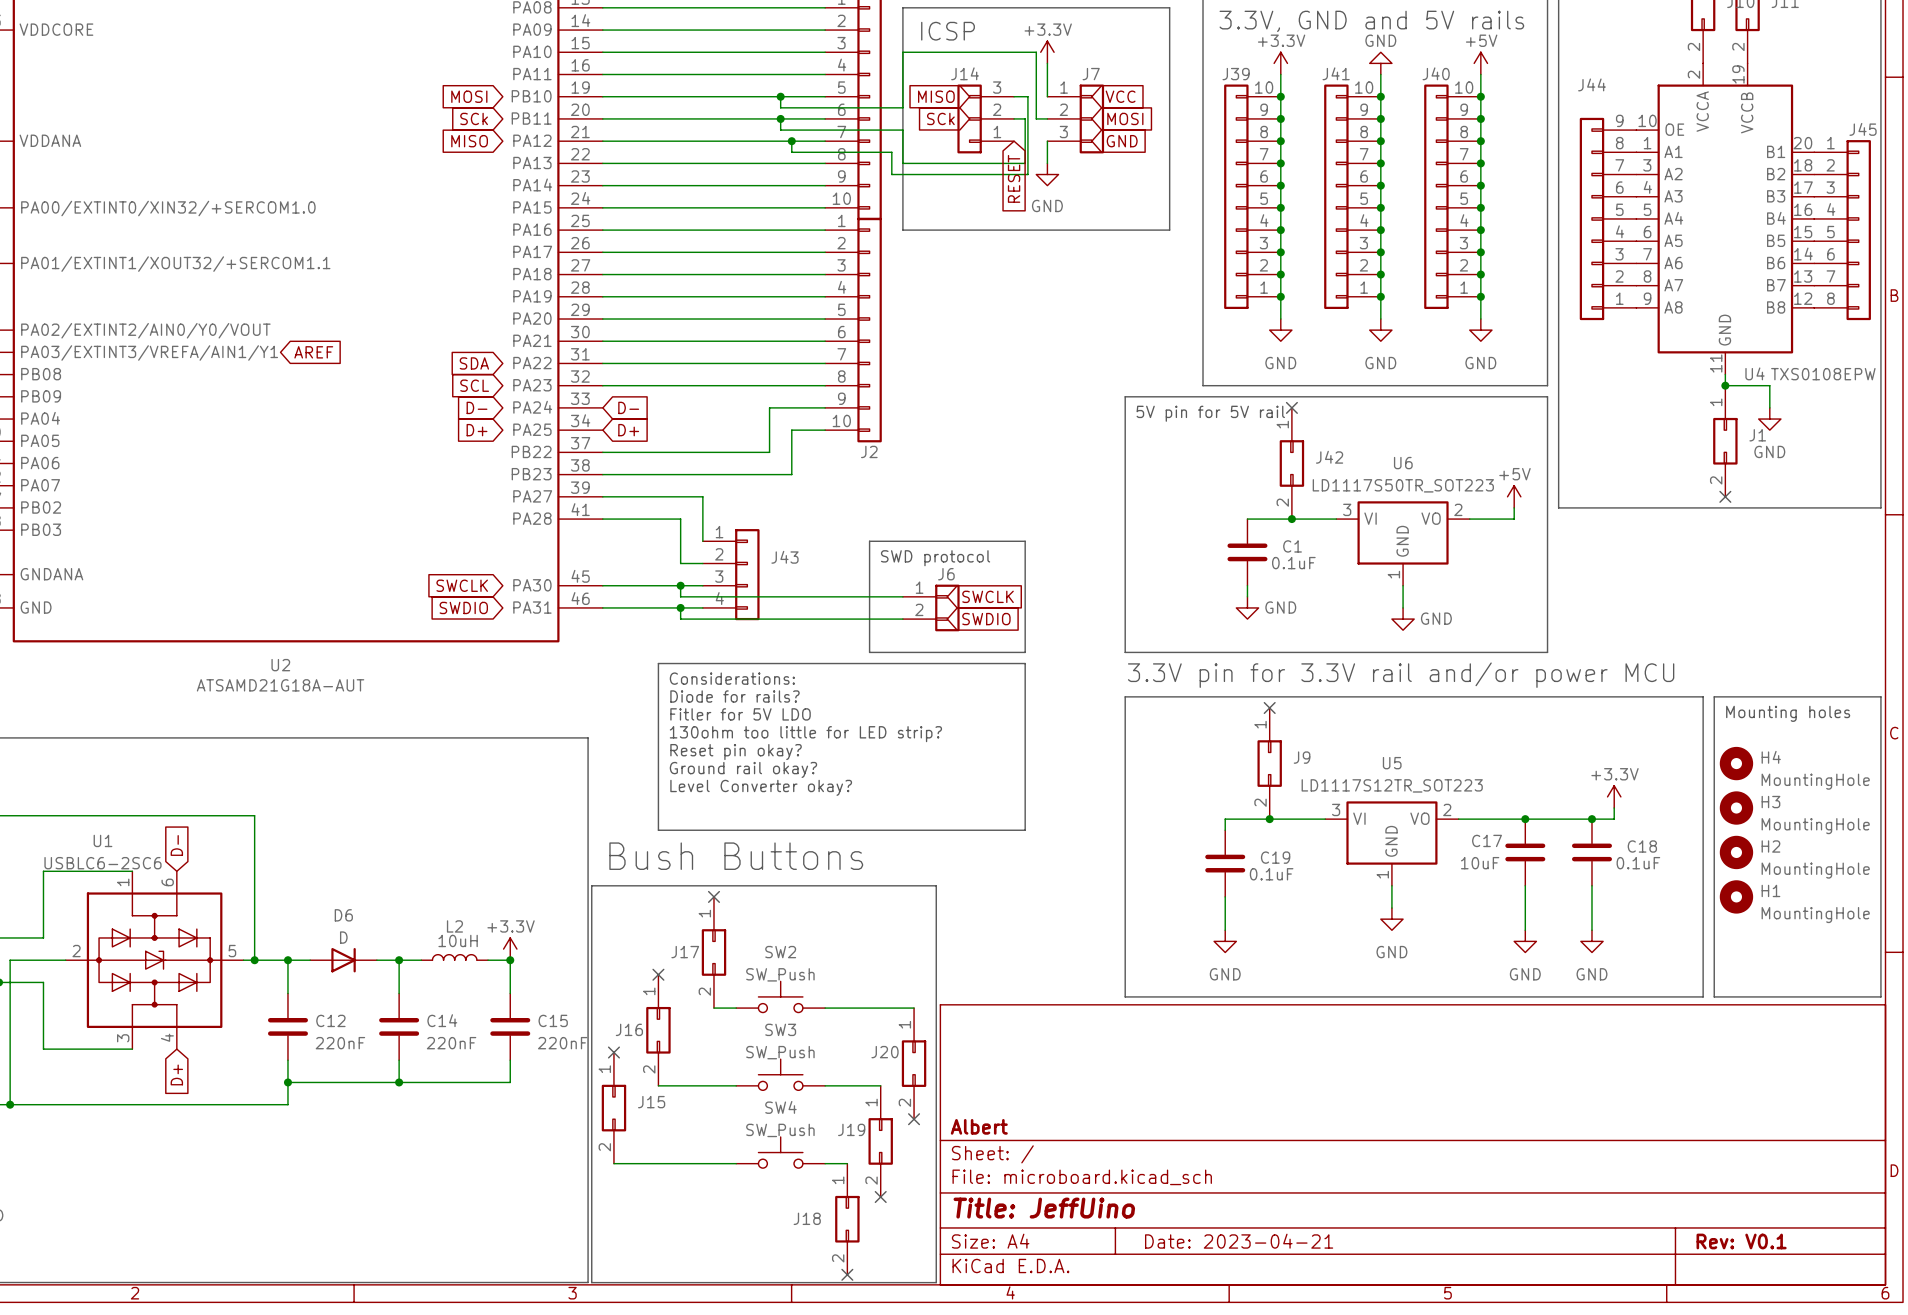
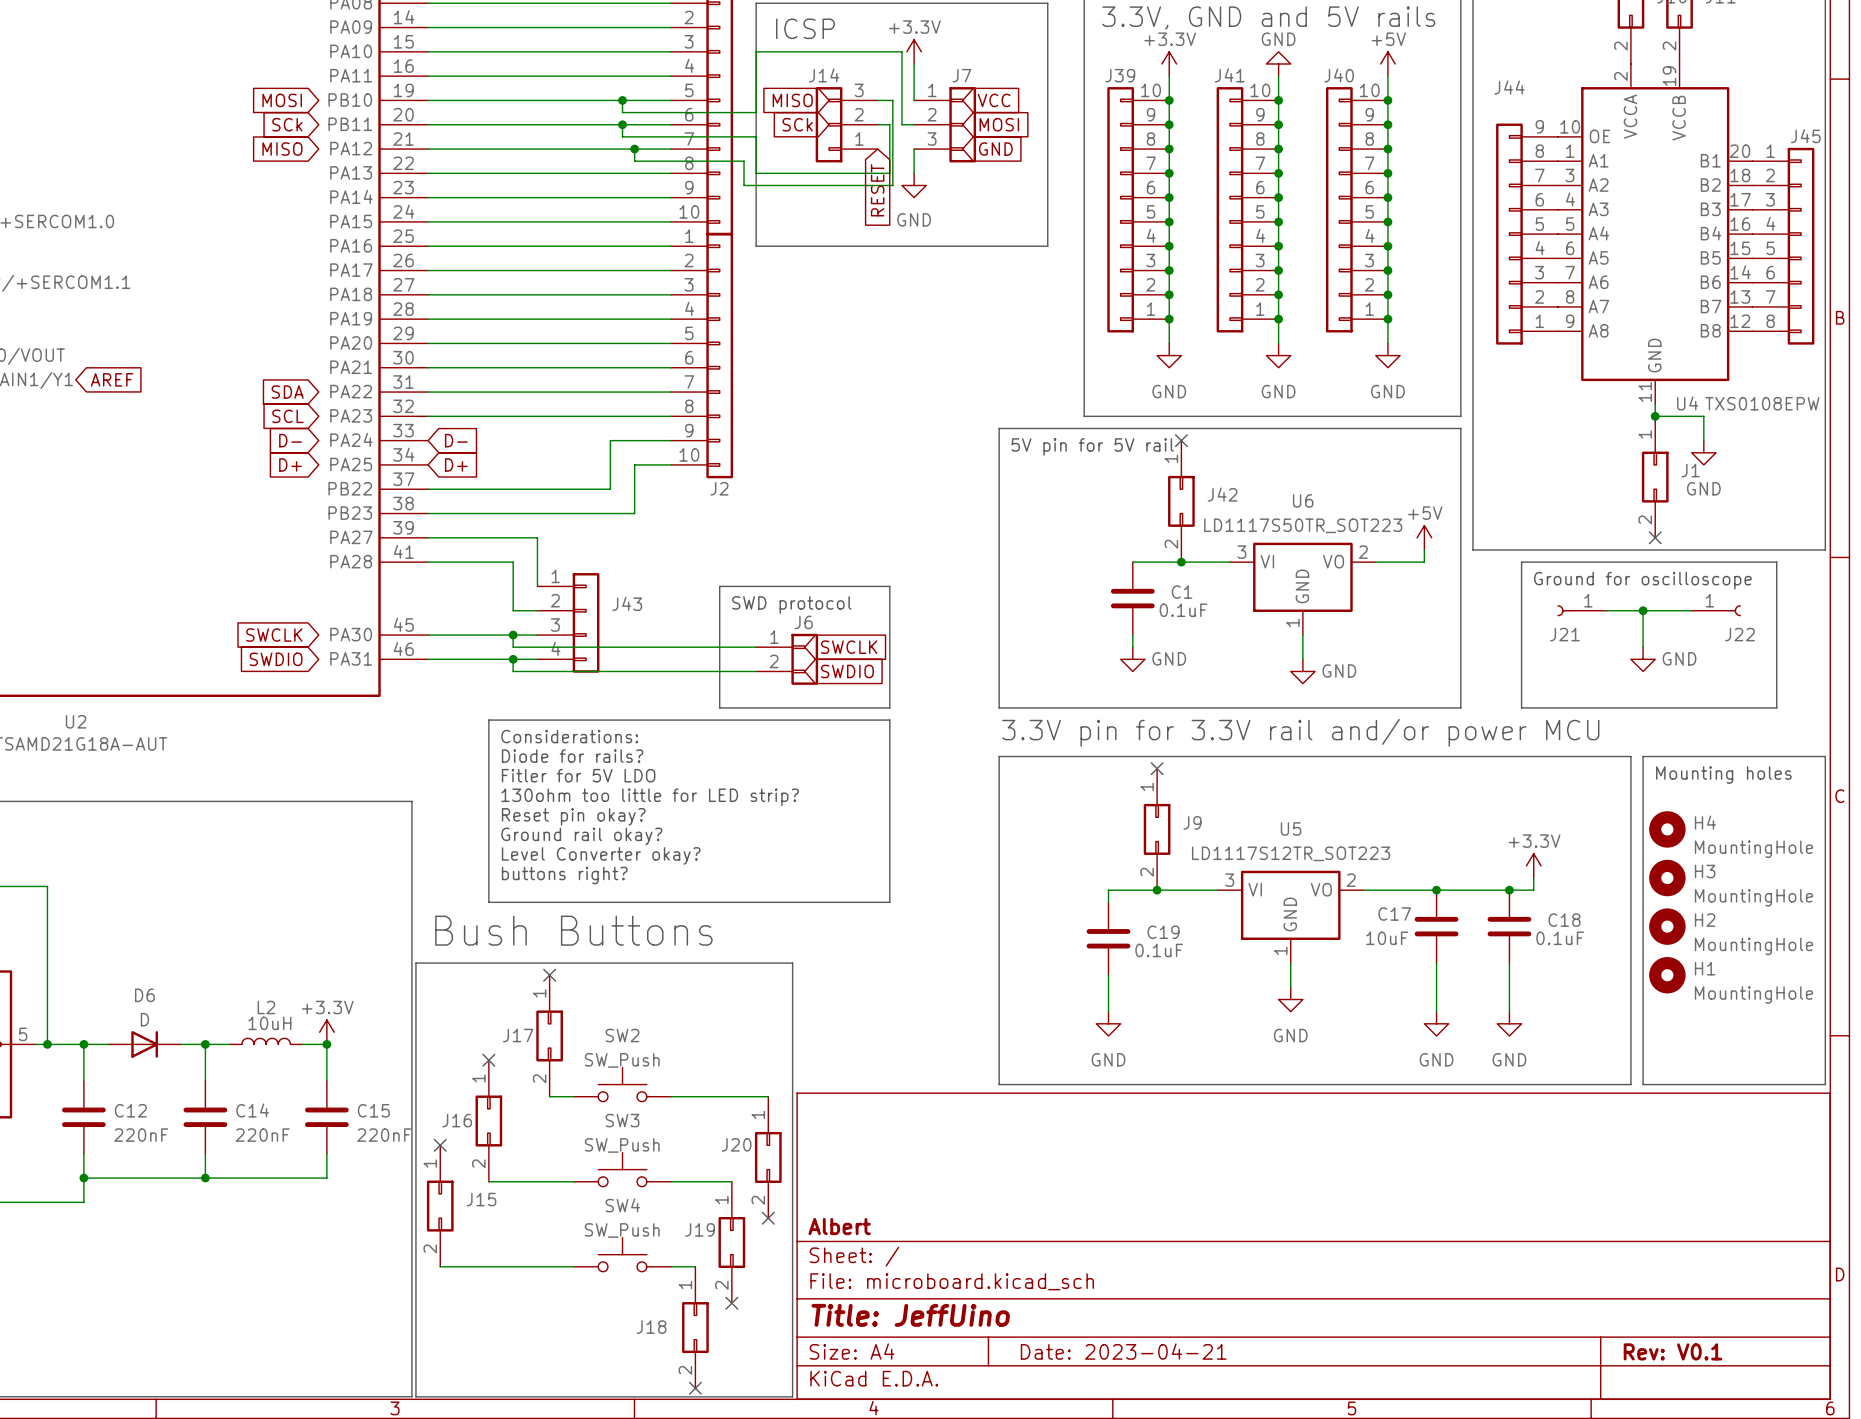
line: none -> (1521, 562) (1776, 562) (1776, 707) (1521, 707) (1521, 562)
text: none -> Ground for oscilloscope (1642, 580)
J21: none -> (1581, 610)
wire: none -> (1606, 610) (1691, 610)
wire: none -> (1643, 610) (1643, 647)
junction: none -> (1643, 610)
J22: none -> (1716, 610)
power symbol: none -> GND (1643, 659)
text: none -> buttons right? (564, 875)

